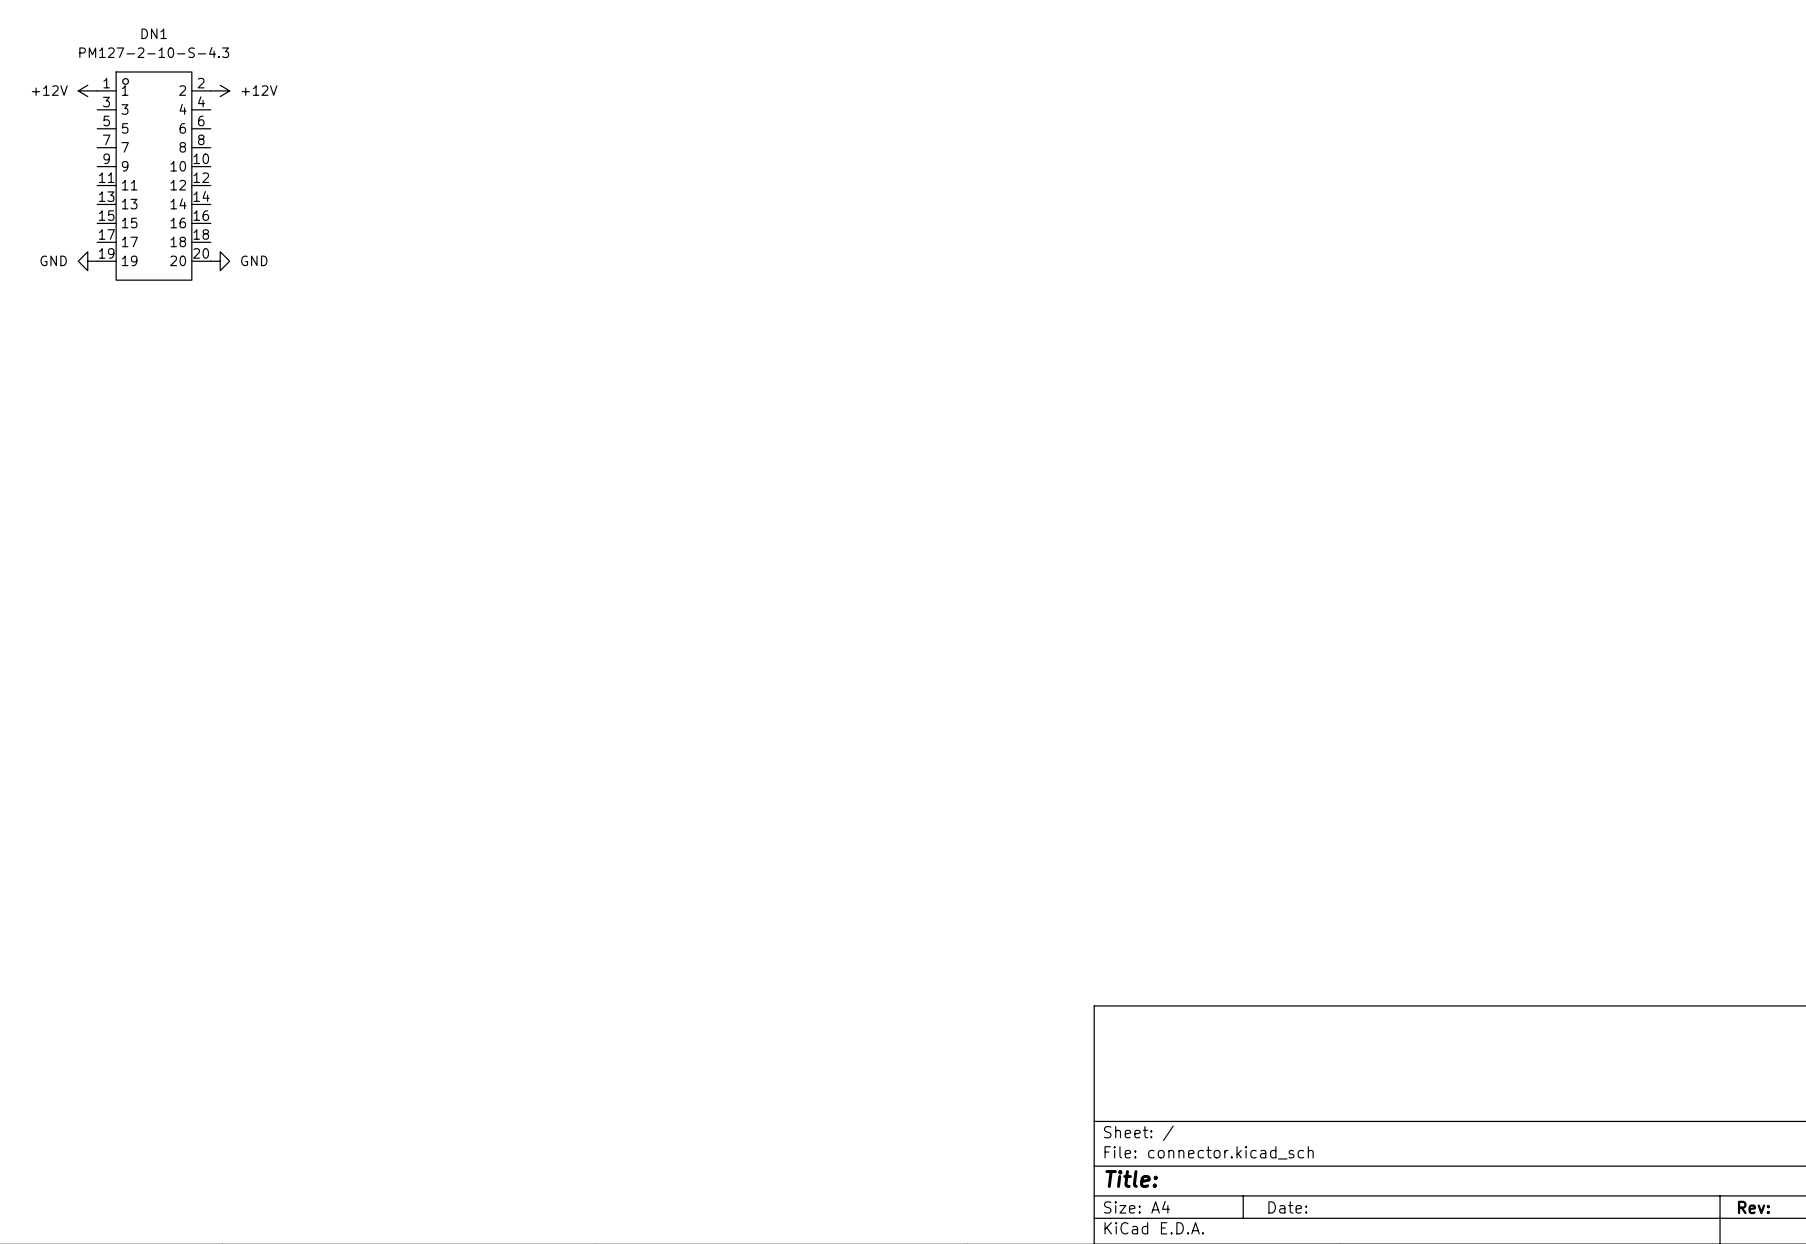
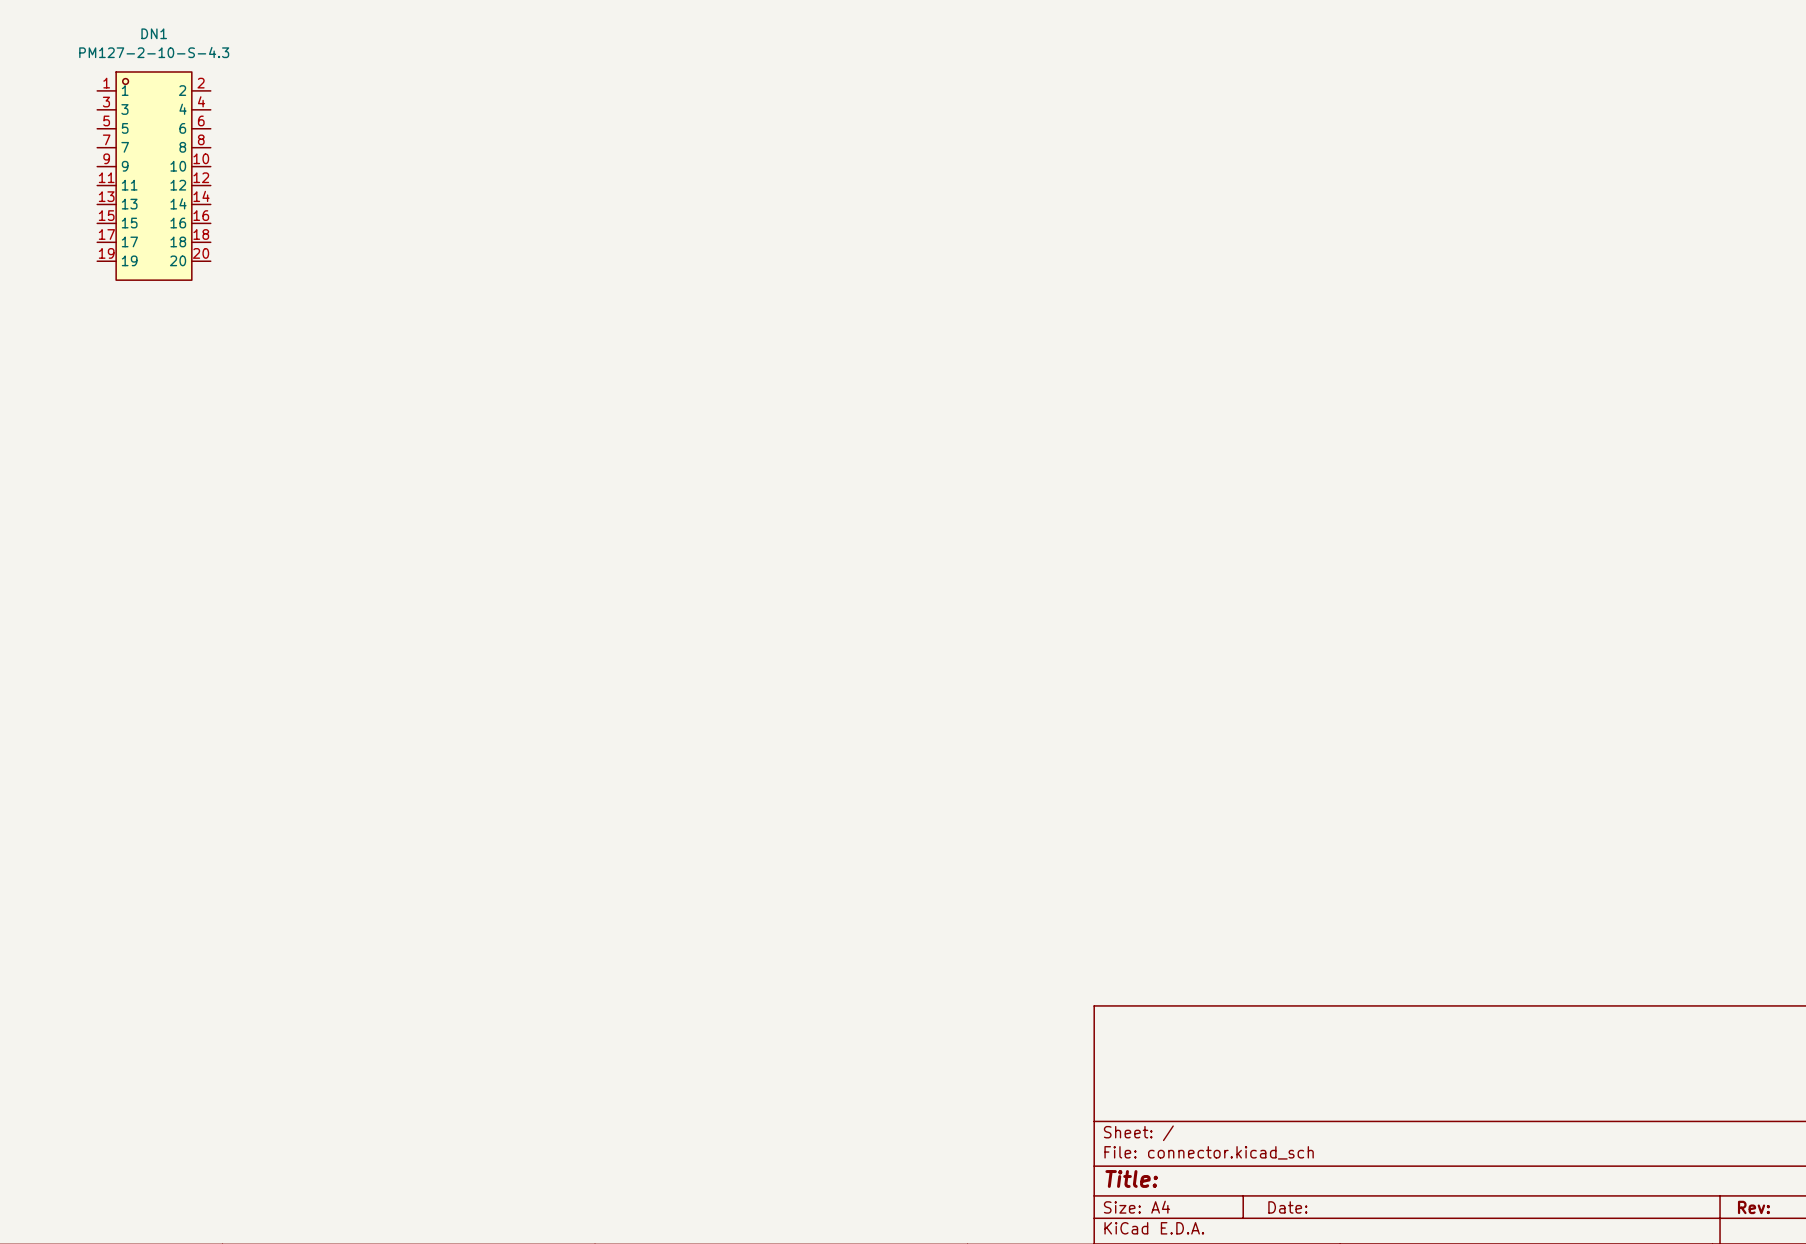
power symbol: +12V (87, 90) -> none
power symbol: +12V (220, 90) -> none
power symbol: GND (87, 261) -> none
power symbol: GND (220, 261) -> none

